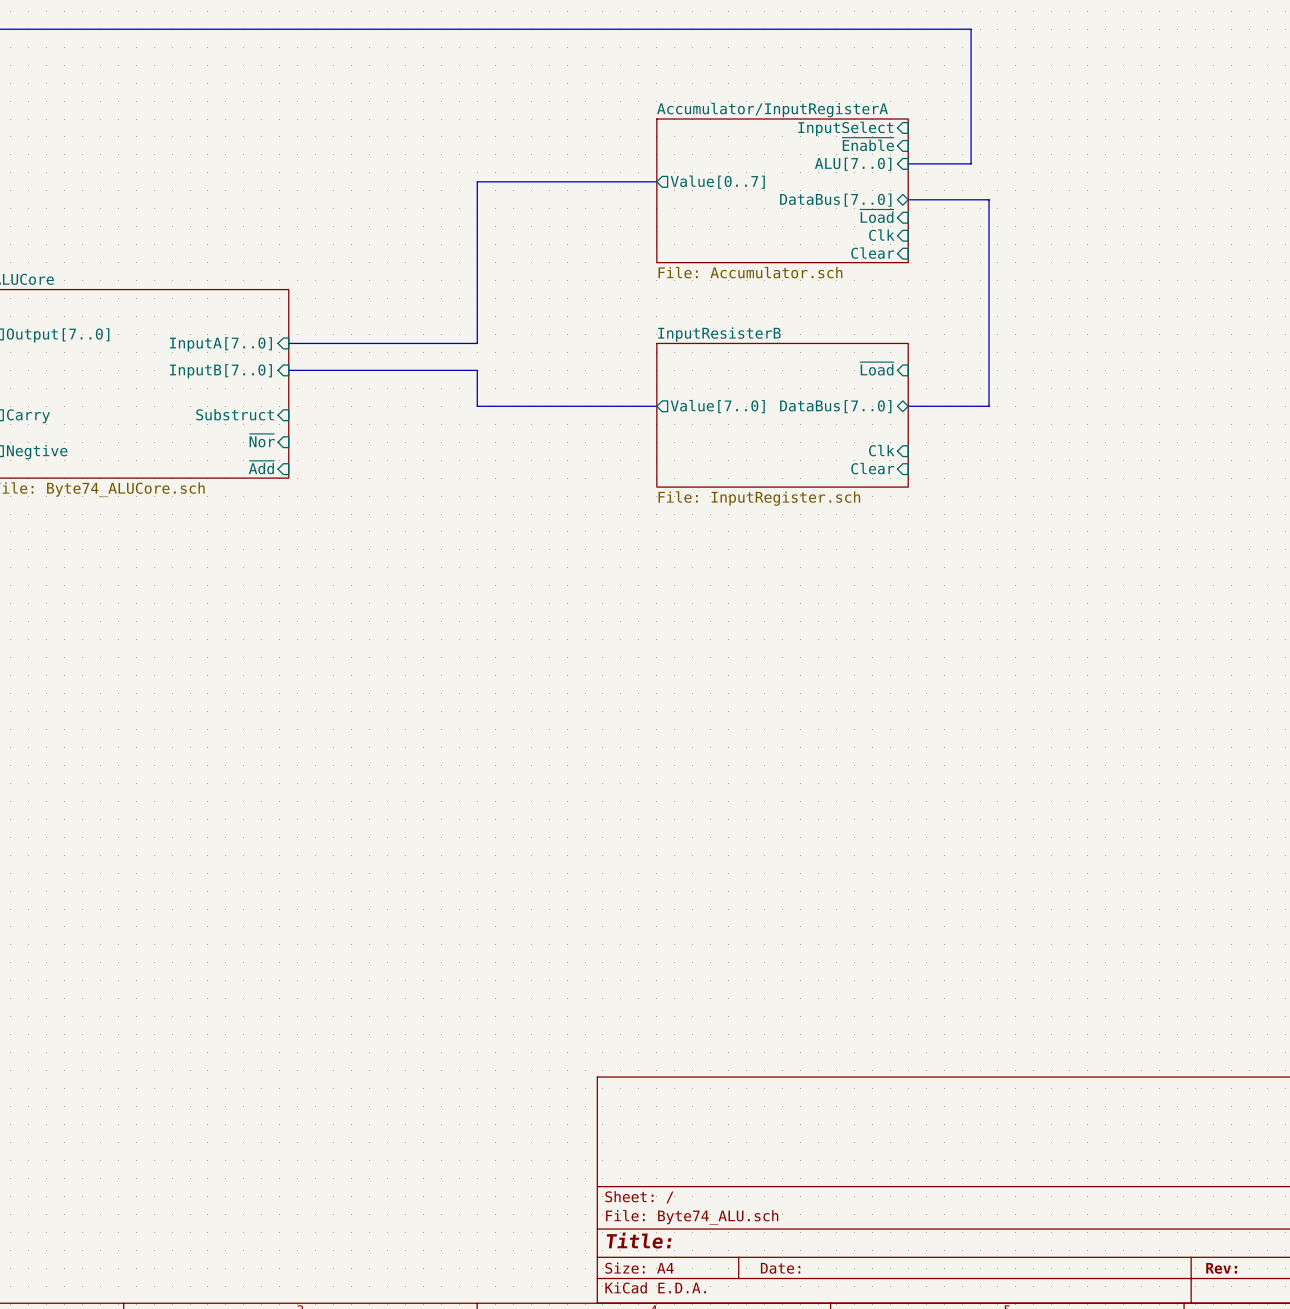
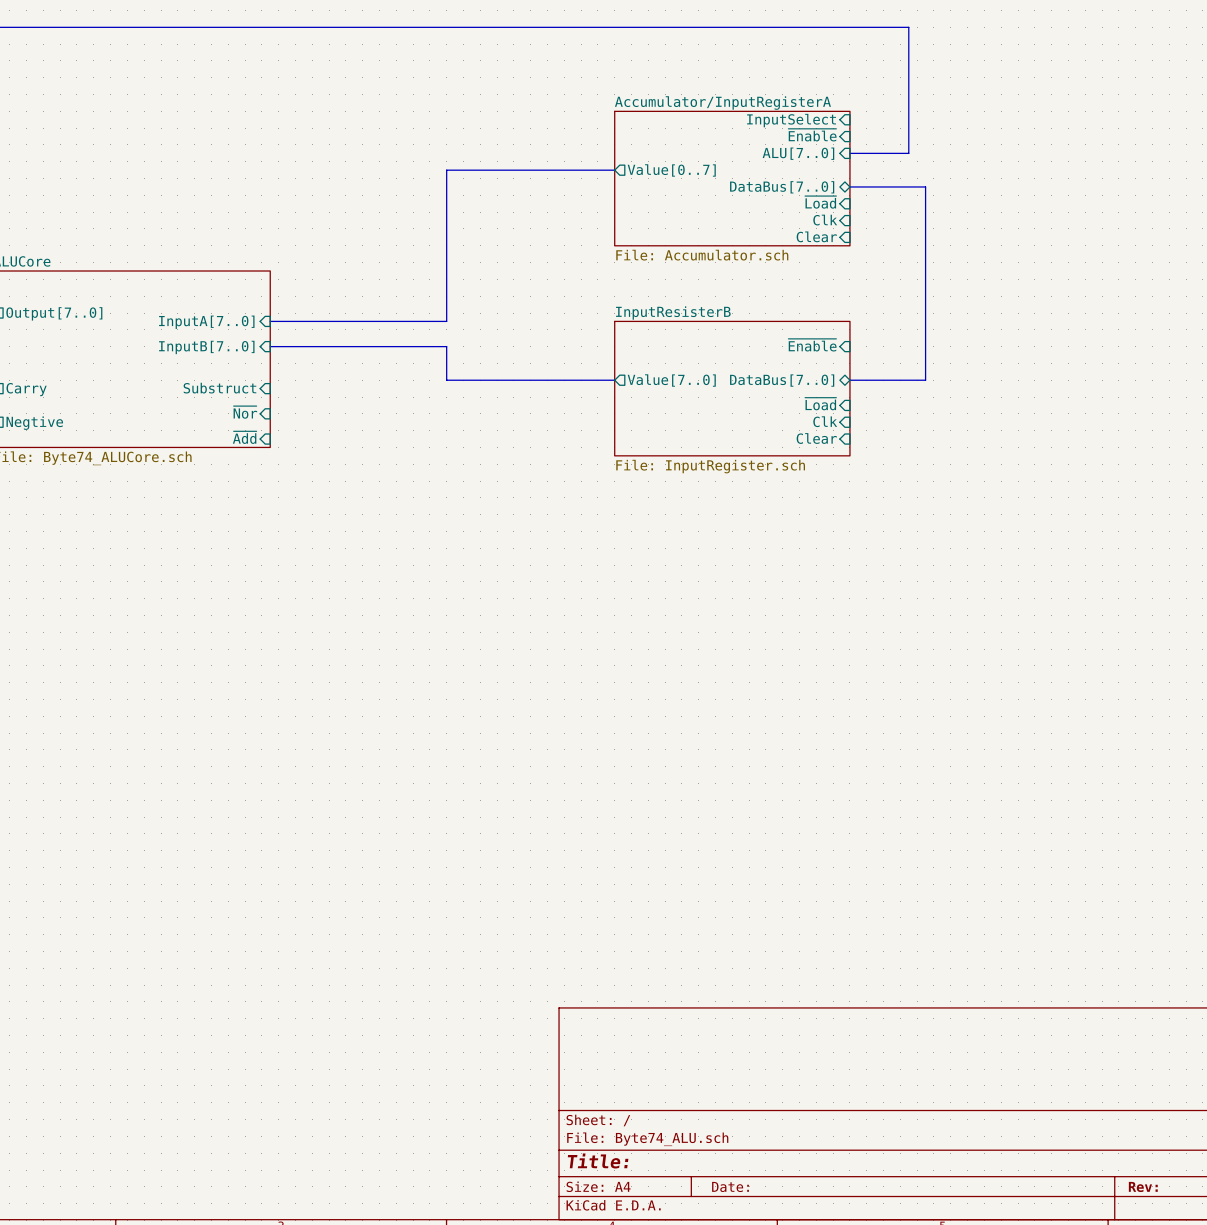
sheet pin: ~{Load} (876, 368) -> ~{Enable} (812, 345)
sheet pin: none -> ~{Load} (820, 403)

